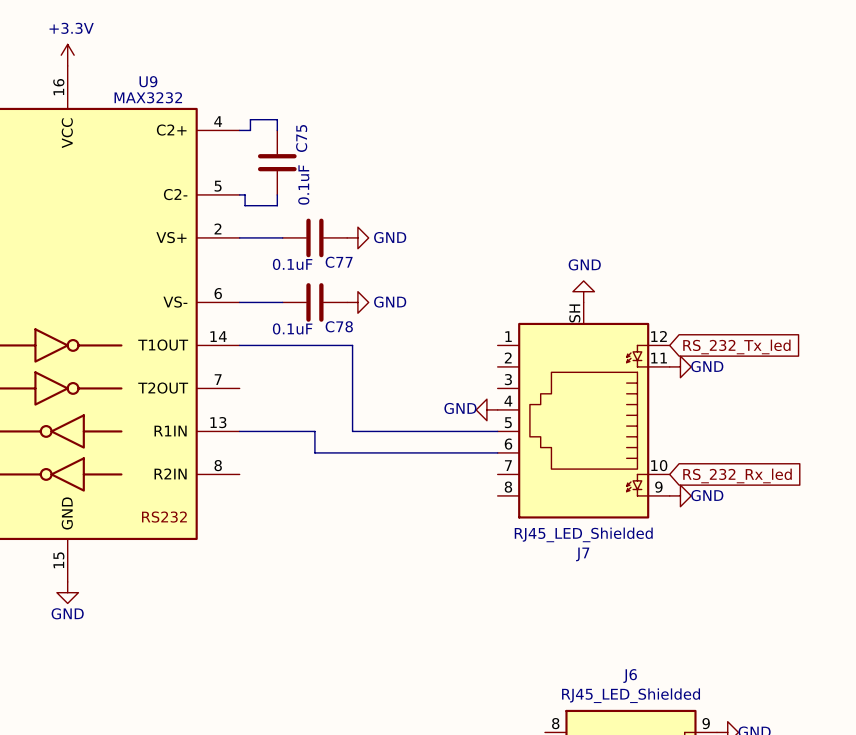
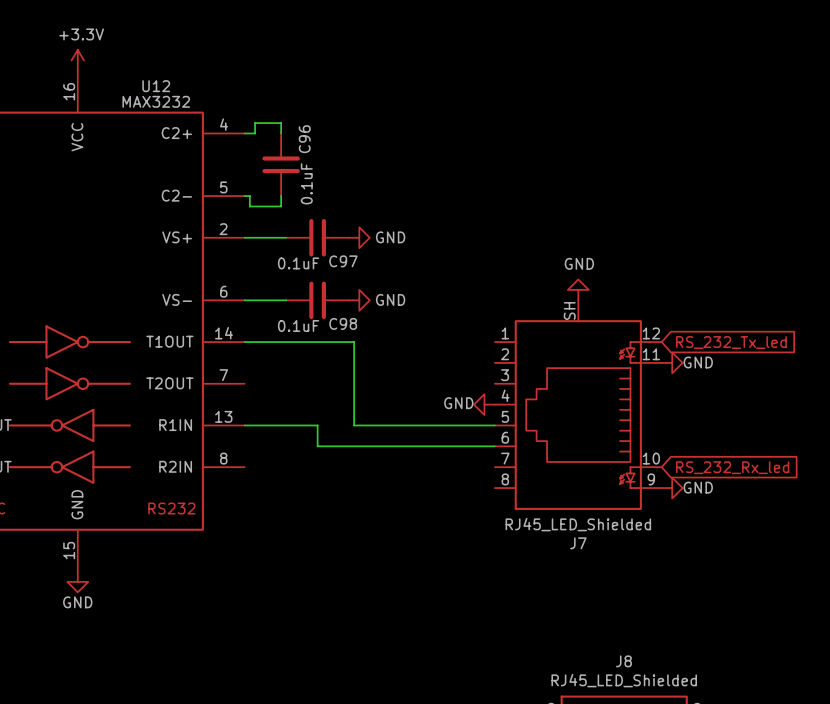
U9 name: U9 (148, 81) -> U12 (156, 86)
C75 name: C75 (301, 138) -> C96 (304, 139)
C77 name: C77 (339, 262) -> C97 (343, 261)
C78 name: C78 (339, 326) -> C98 (343, 323)
J6 name: J6 (630, 676) -> J8 (623, 661)

